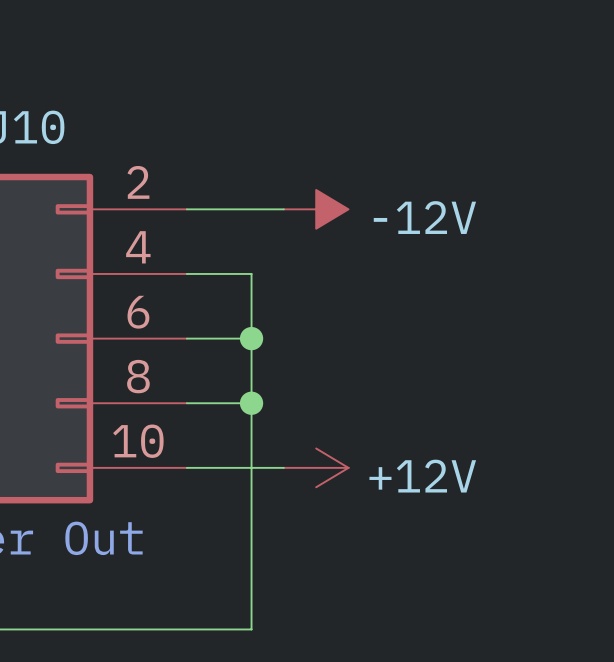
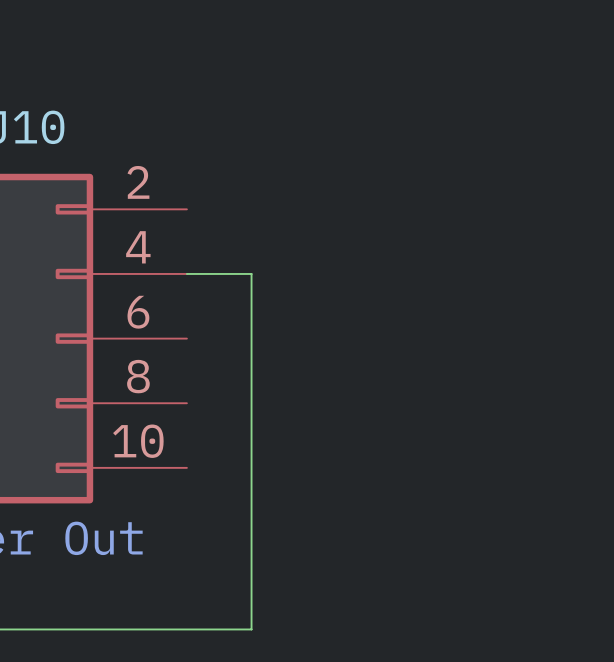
wire: (186, 209) (283, 209) -> none
power symbol: -12V (316, 209) -> none
wire: (186, 338) (251, 338) -> none
junction: (251, 338) -> none
wire: (186, 403) (251, 403) -> none
junction: (251, 403) -> none
wire: (186, 467) (283, 467) -> none
power symbol: +12V (316, 467) -> none

